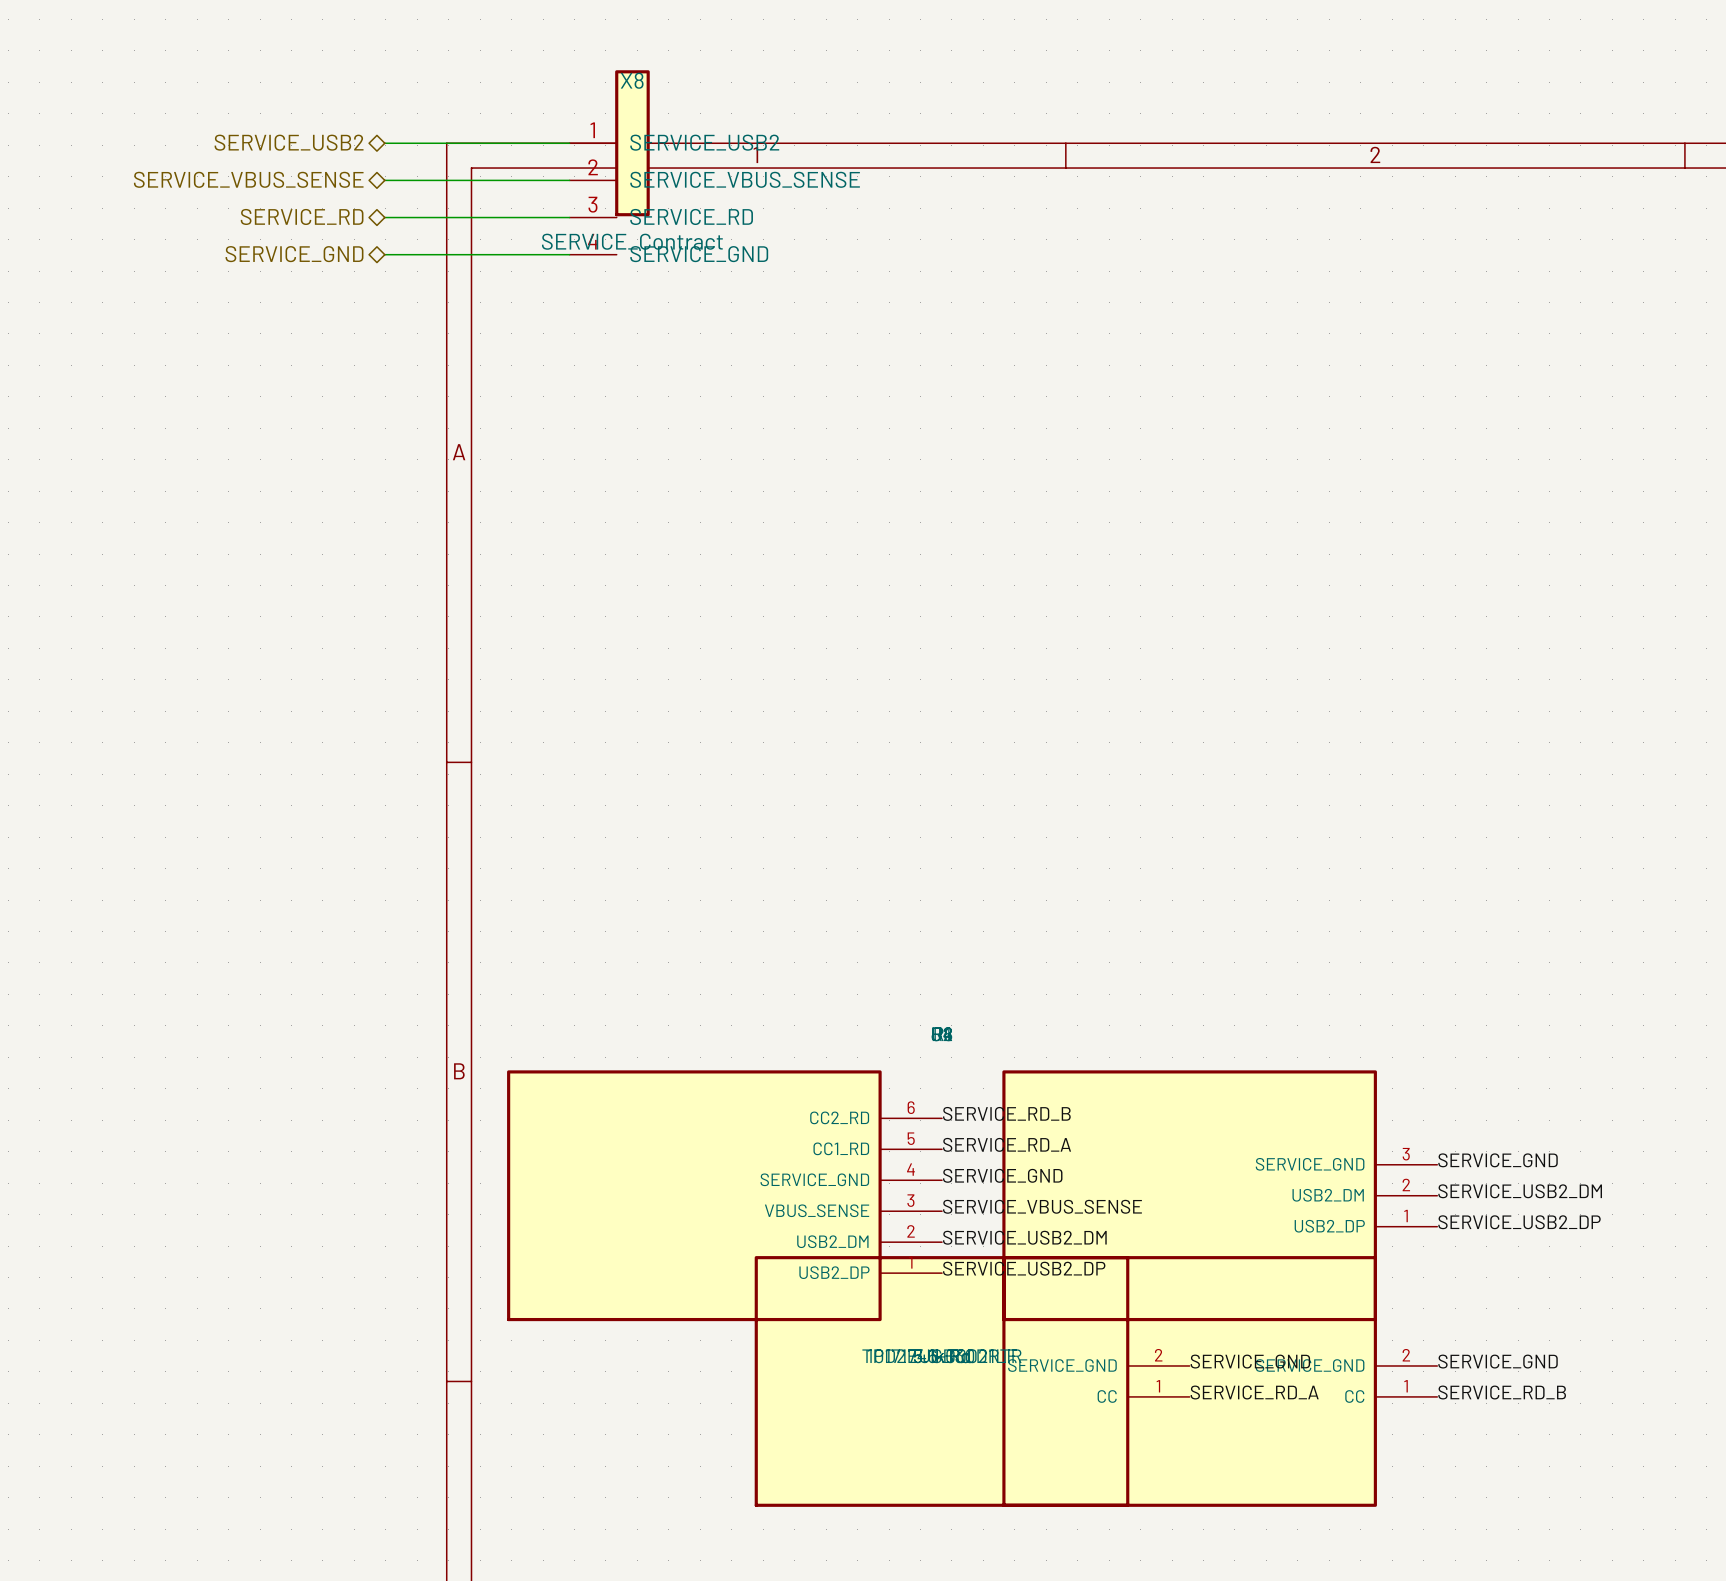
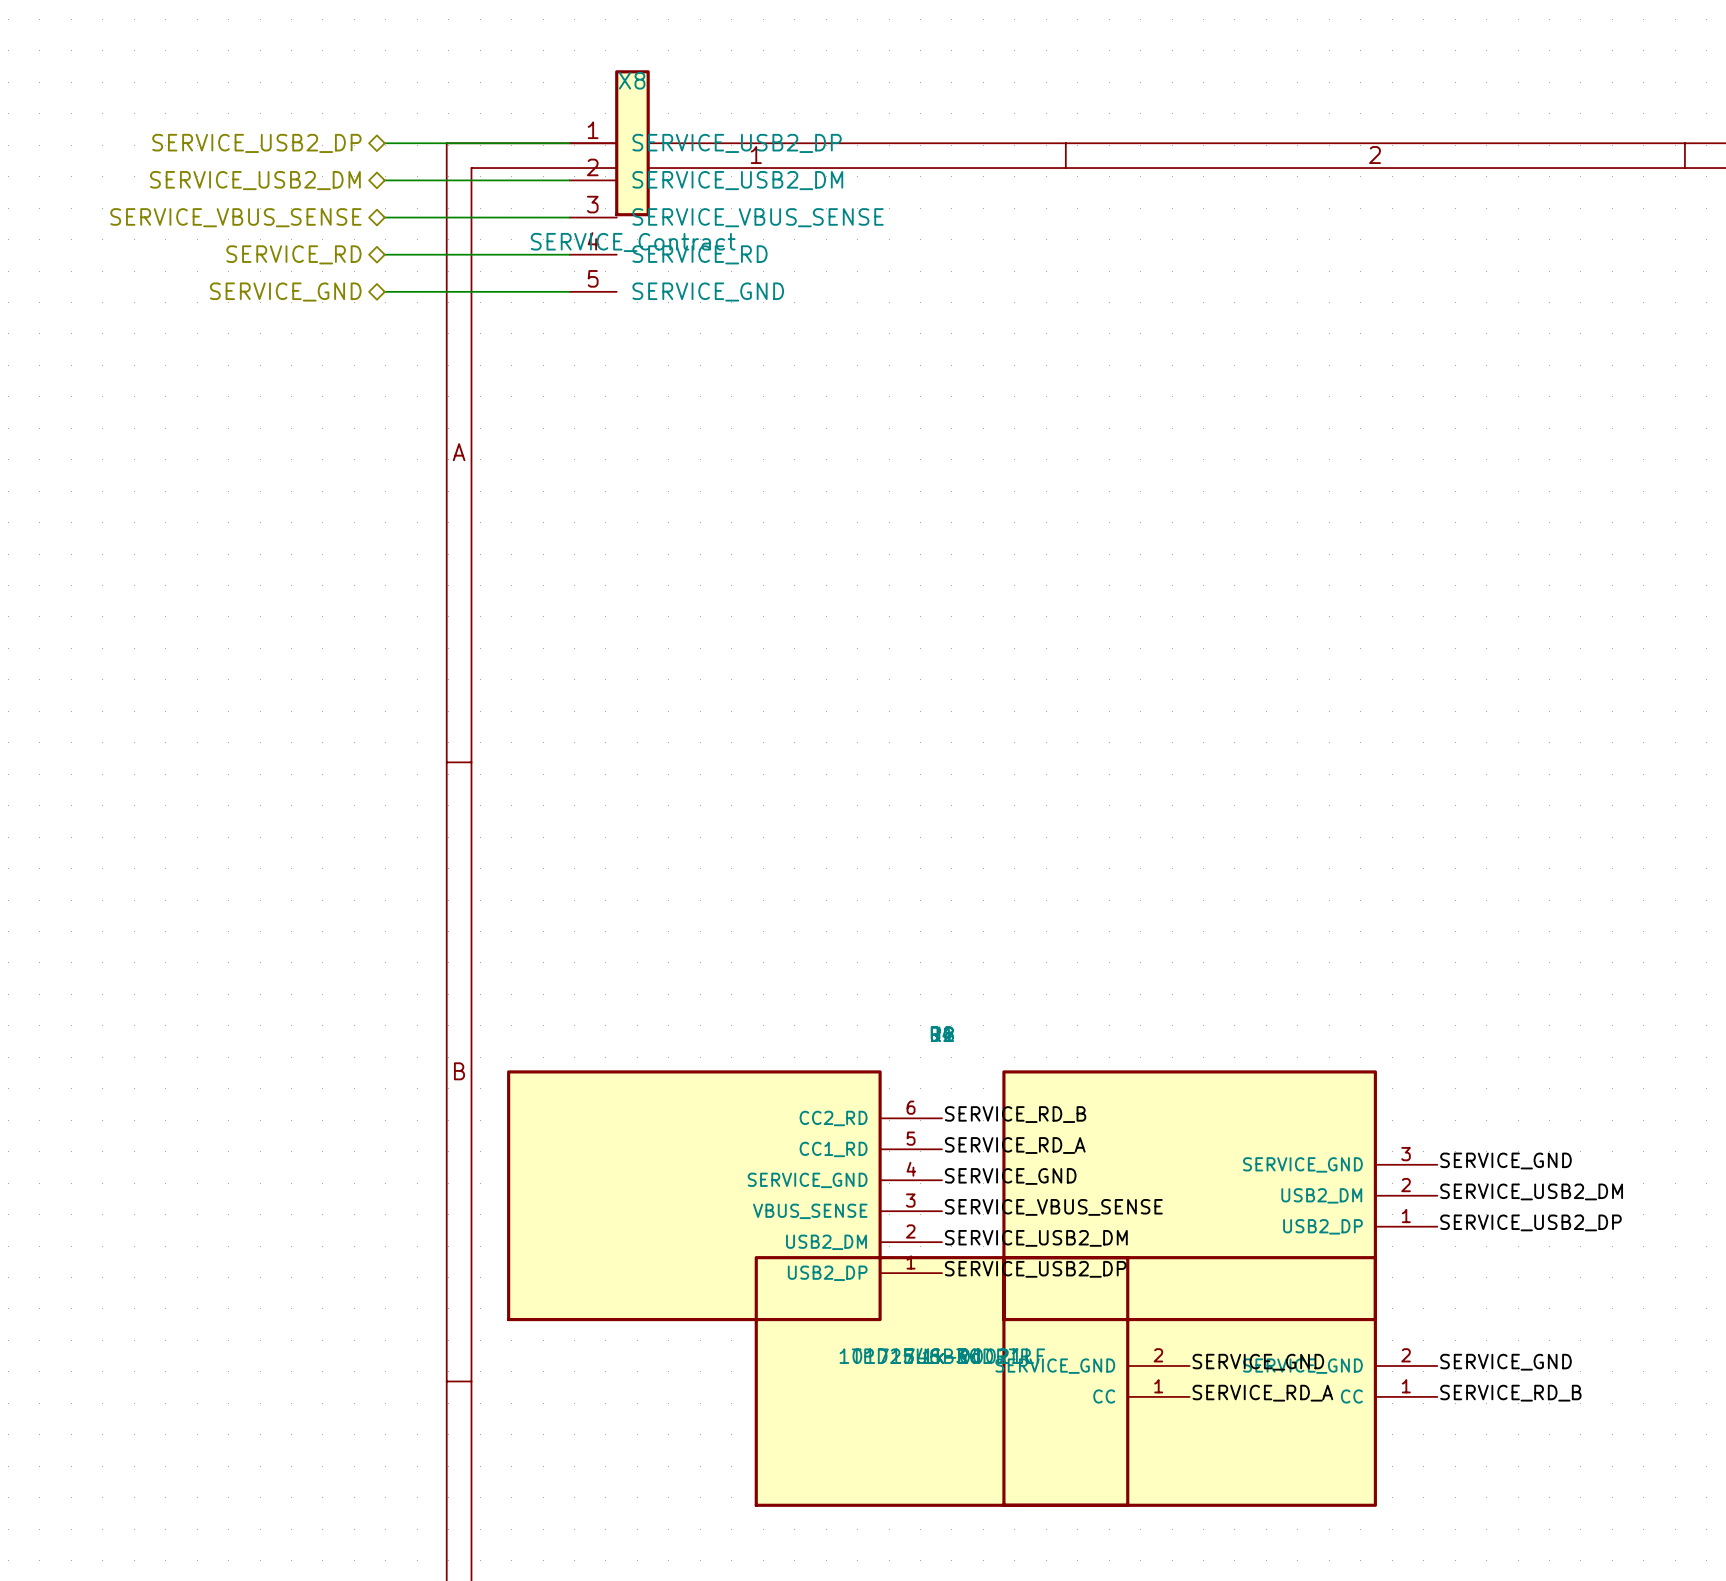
X8 symbol: [569, 70, 650, 255] -> [569, 70, 650, 292]
hierarchical label: SERVICE_USB2 (289, 142) -> SERVICE_USB2_DP (256, 143)
hierarchical label: SERVICE_VBUS_SENSE (248, 179) -> SERVICE_USB2_DM (255, 180)
hierarchical label: SERVICE_RD (302, 216) -> SERVICE_VBUS_SENSE (235, 217)
hierarchical label: SERVICE_GND (294, 254) -> SERVICE_RD (293, 254)
hierarchical label: none -> SERVICE_GND (285, 292)
wire: none -> (384, 291) (569, 291)

